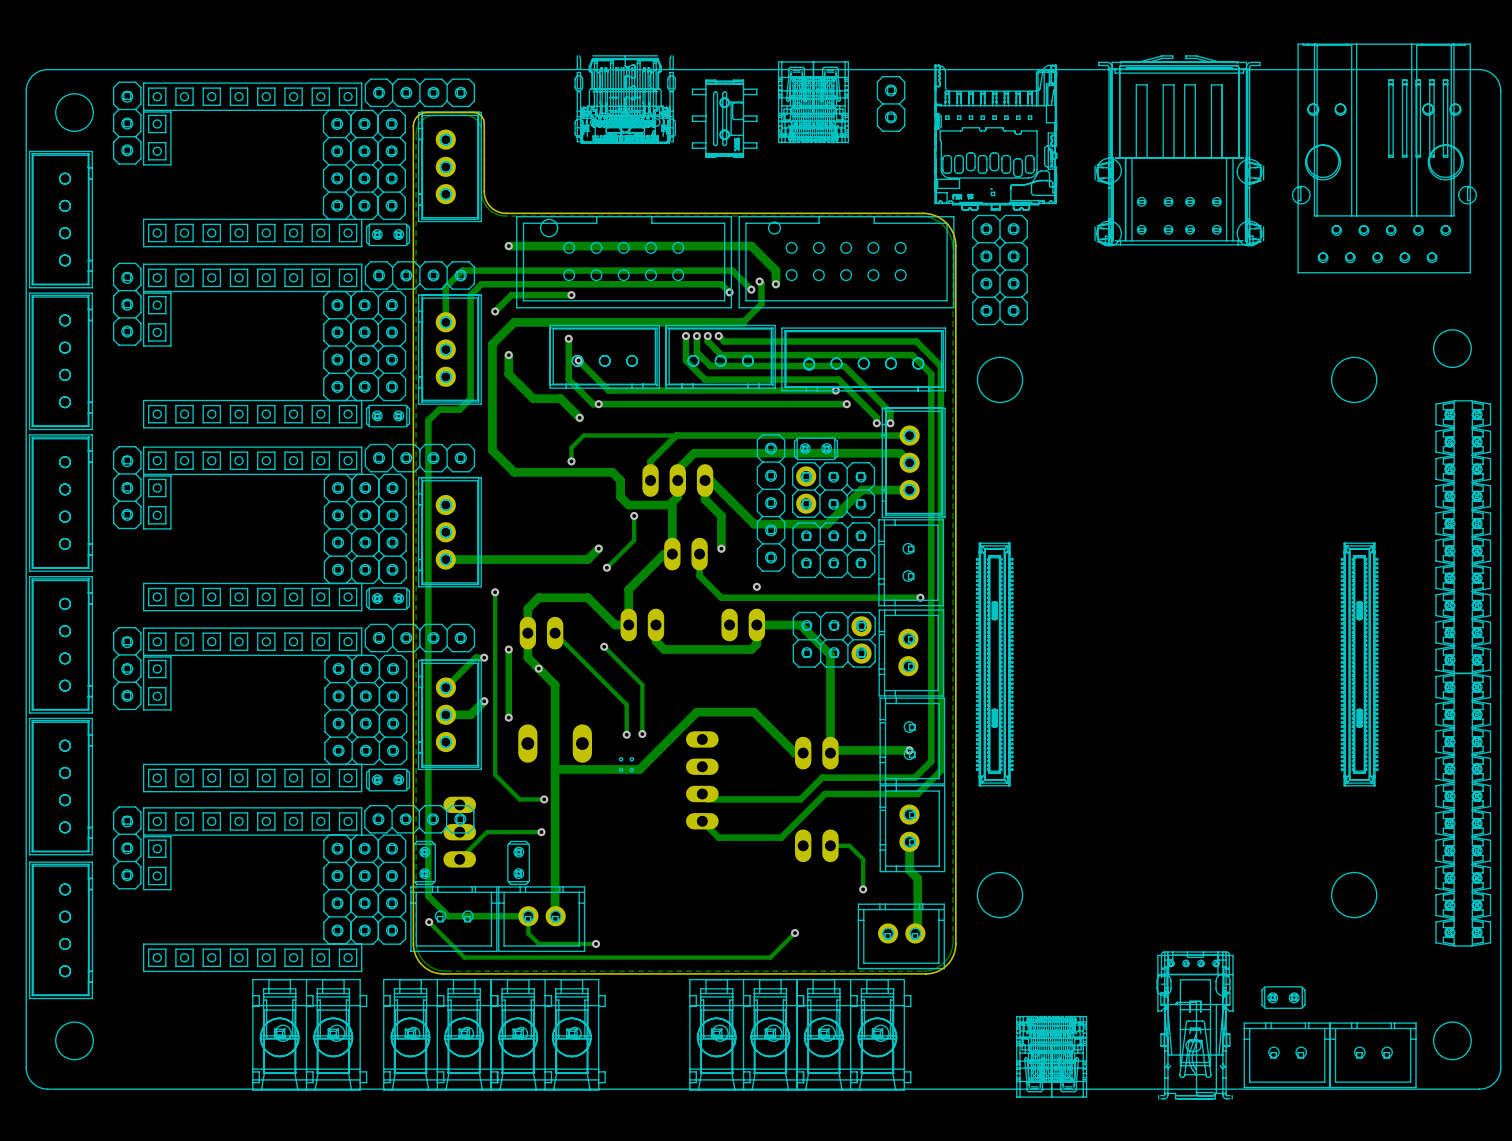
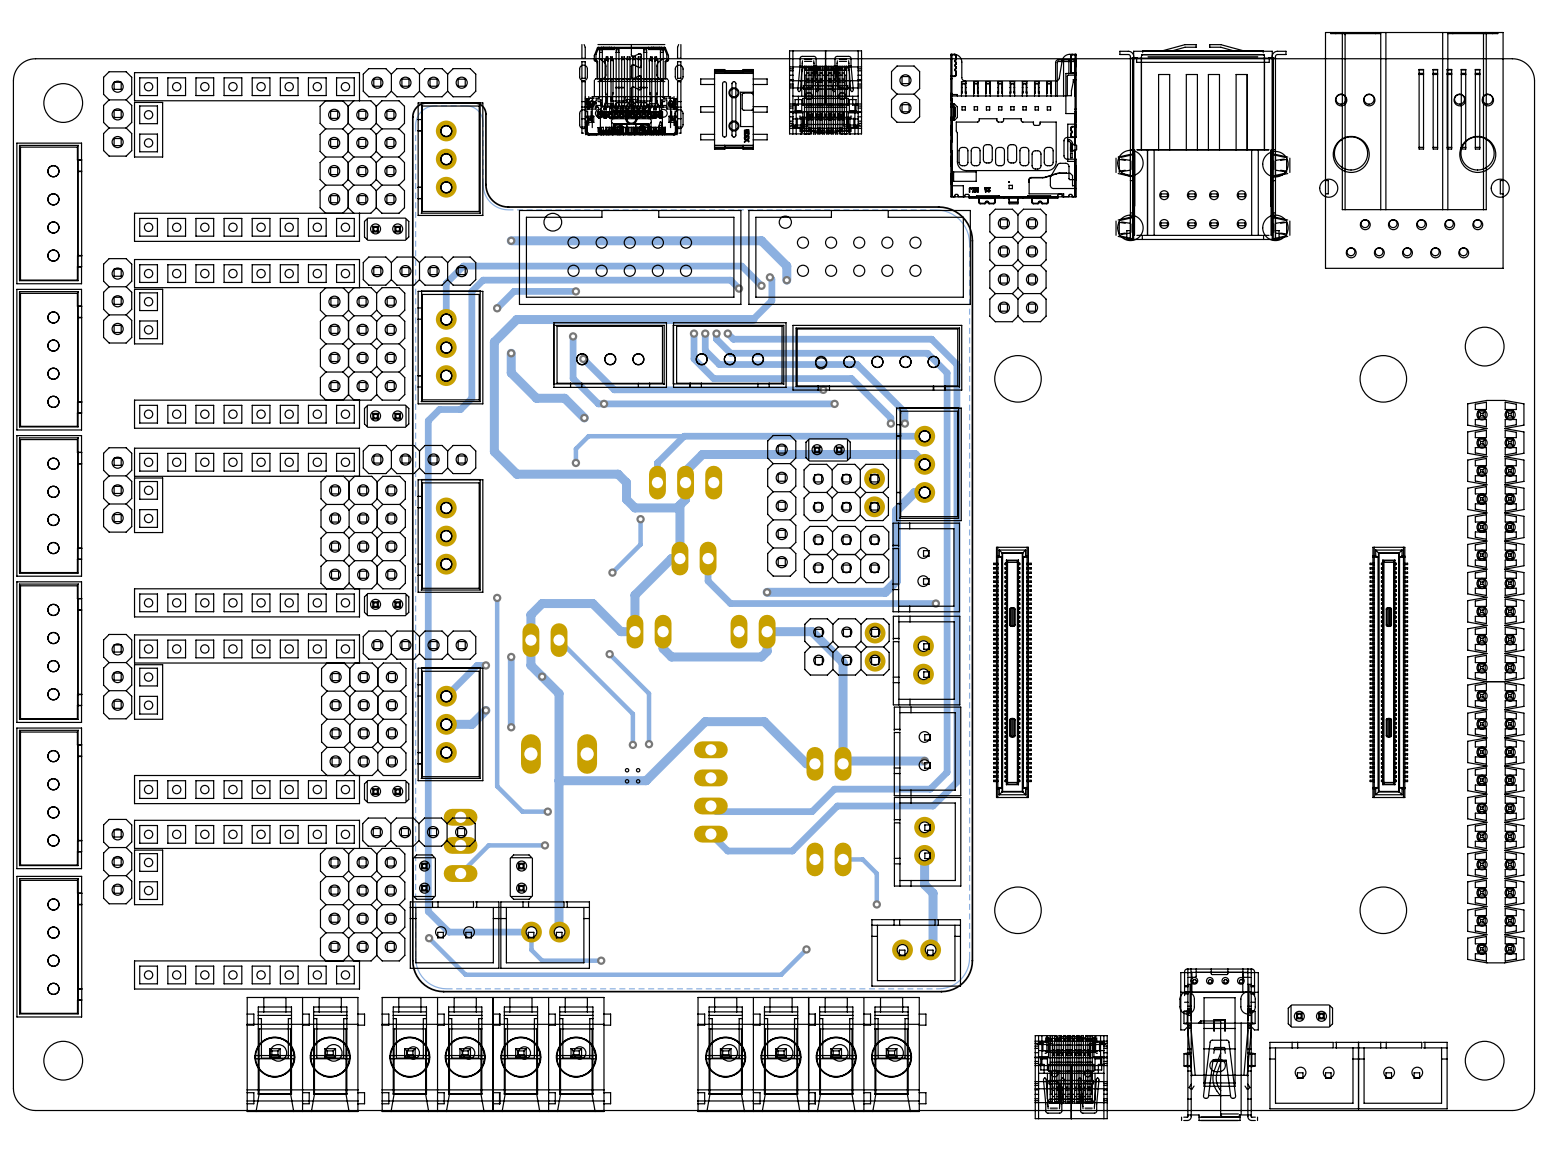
via: none -> (823, 389)
track: (835, 390) (811, 390) -> none
via: (835, 390) -> none
via: none -> (834, 403)
track: (846, 404) (822, 404) -> none
via: (846, 404) -> none
part position: (806, 490) -> (874, 492)
track: (899, 490) (861, 490) (827, 524) (754, 524) (710, 480) (705, 480) (705, 499) (721, 515) (721, 548) -> (914, 492) (896, 510) (896, 581) (885, 592) (767, 592)
track: (598, 548) (587, 559) (445, 559) -> none
via: (598, 548) -> none
via: (721, 548) -> none

